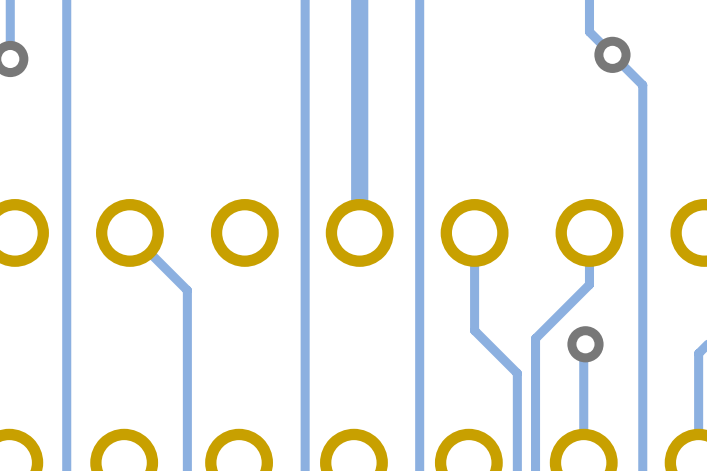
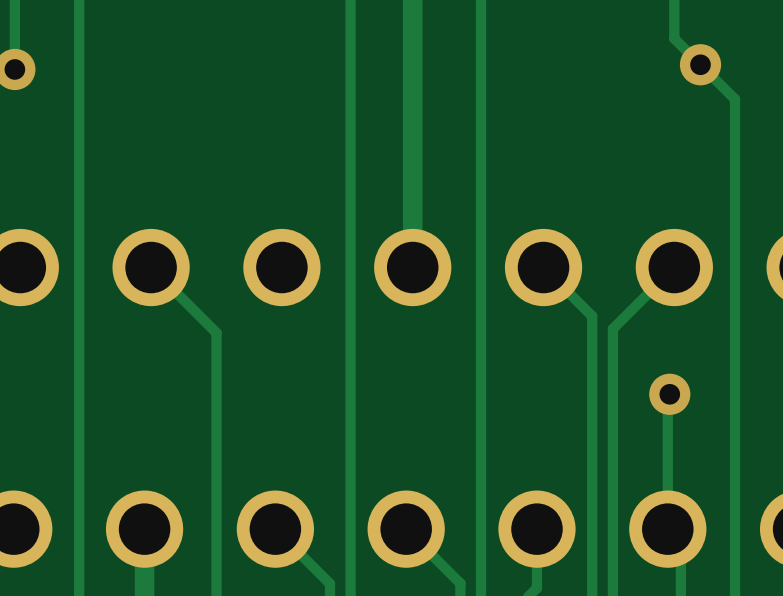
track: (474, 232) (474, 330) (517, 373) -> (543, 267) (592, 316) (592, 427)
track: (589, 232) (589, 284) (535, 338) -> (674, 267) (612, 328) (612, 387)

